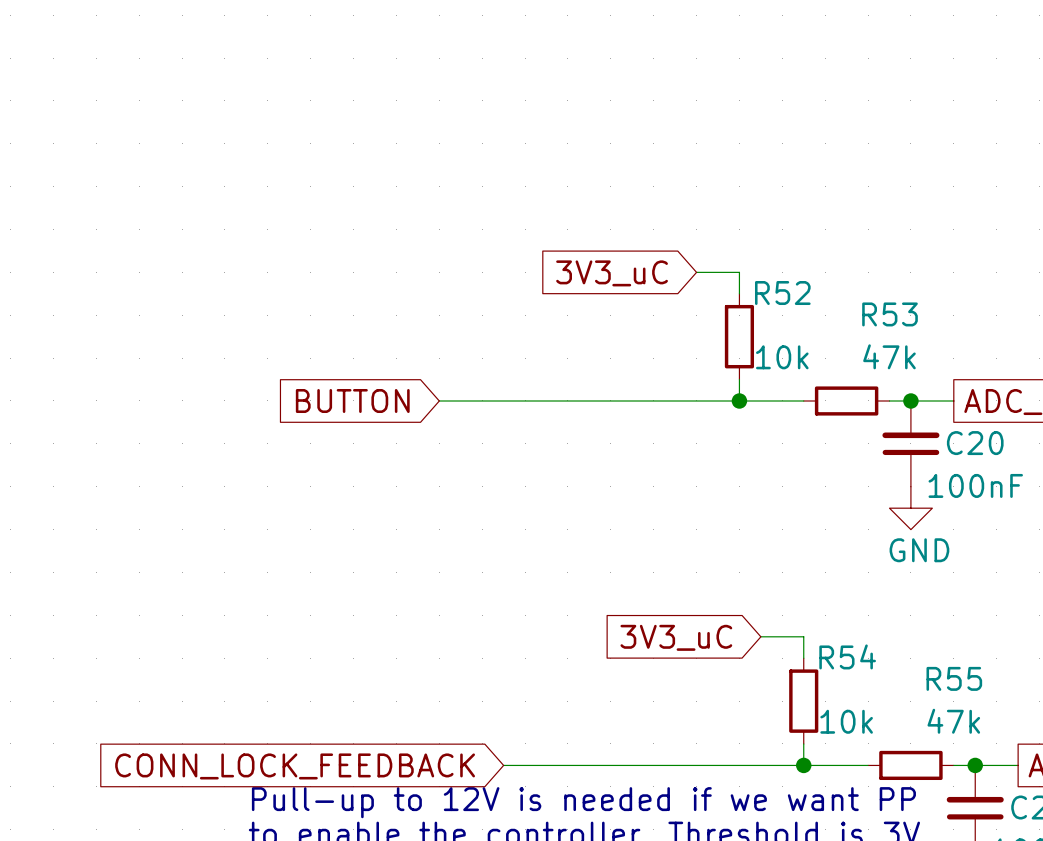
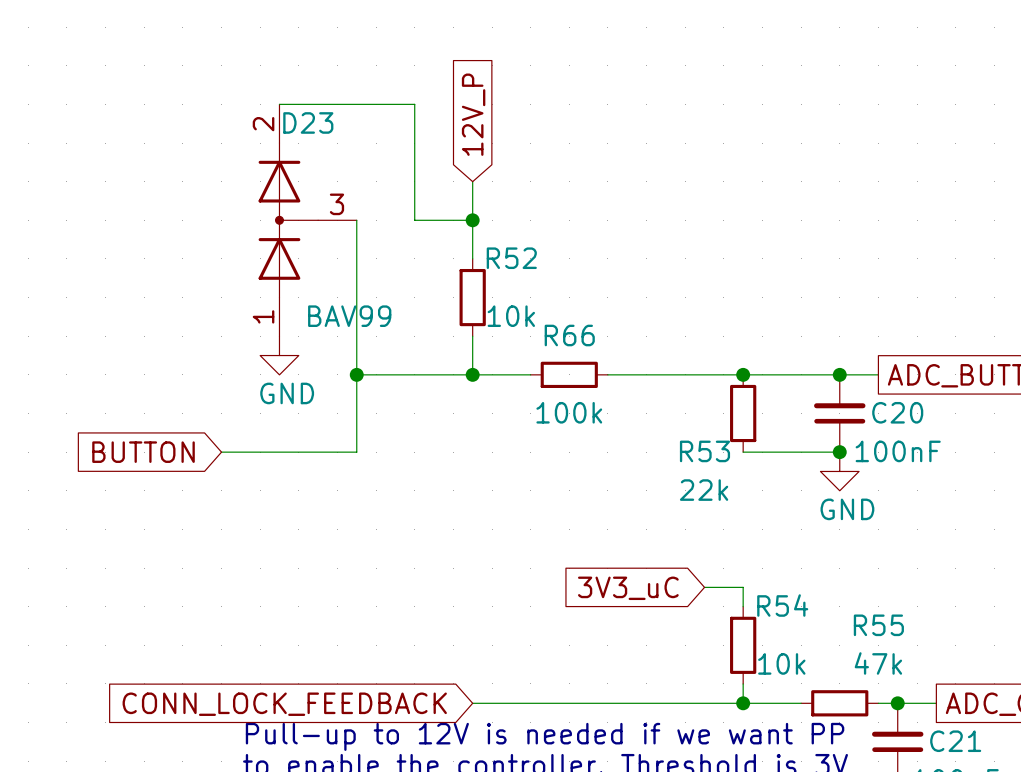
wire: none -> (279, 104) (414, 104) (414, 220) (472, 220)
global label: none -> 12V_P (473, 114)
wire: none -> (472, 181) (472, 258)
D23: none -> BAV99 (307, 220)
wire: none -> (356, 220) (356, 452) (221, 452)
junction: none -> (472, 220)
wire: (696, 272) (739, 272) (739, 293) -> none
global label: 3V3_uC (612, 273) -> none
R53 name position: R53 (890, 314) -> R53 (704, 451)
R52 position: (739, 336) -> (472, 297)
R53 value: 47k (889, 356) -> 22k (704, 490)
wire: none -> (472, 336) (472, 374)
power symbol: none -> GND (279, 355)
wire: (739, 379) (739, 400) -> none
global label position: BUTTON (352, 400) -> BUTTON (143, 452)
wire: none -> (356, 374) (414, 374)
junction: none -> (356, 374)
junction: none -> (472, 374)
wire: (567, 400) (653, 400) -> (743, 374) (820, 374)
R66: none -> 100k (569, 374)
junction position: (739, 400) -> (743, 374)
R53 rotation: 0° (846, 400) -> 90° clockwise (743, 413)
R53 position: (846, 400) -> (743, 413)
wire: none -> (743, 452) (839, 452)
junction: none -> (839, 452)

